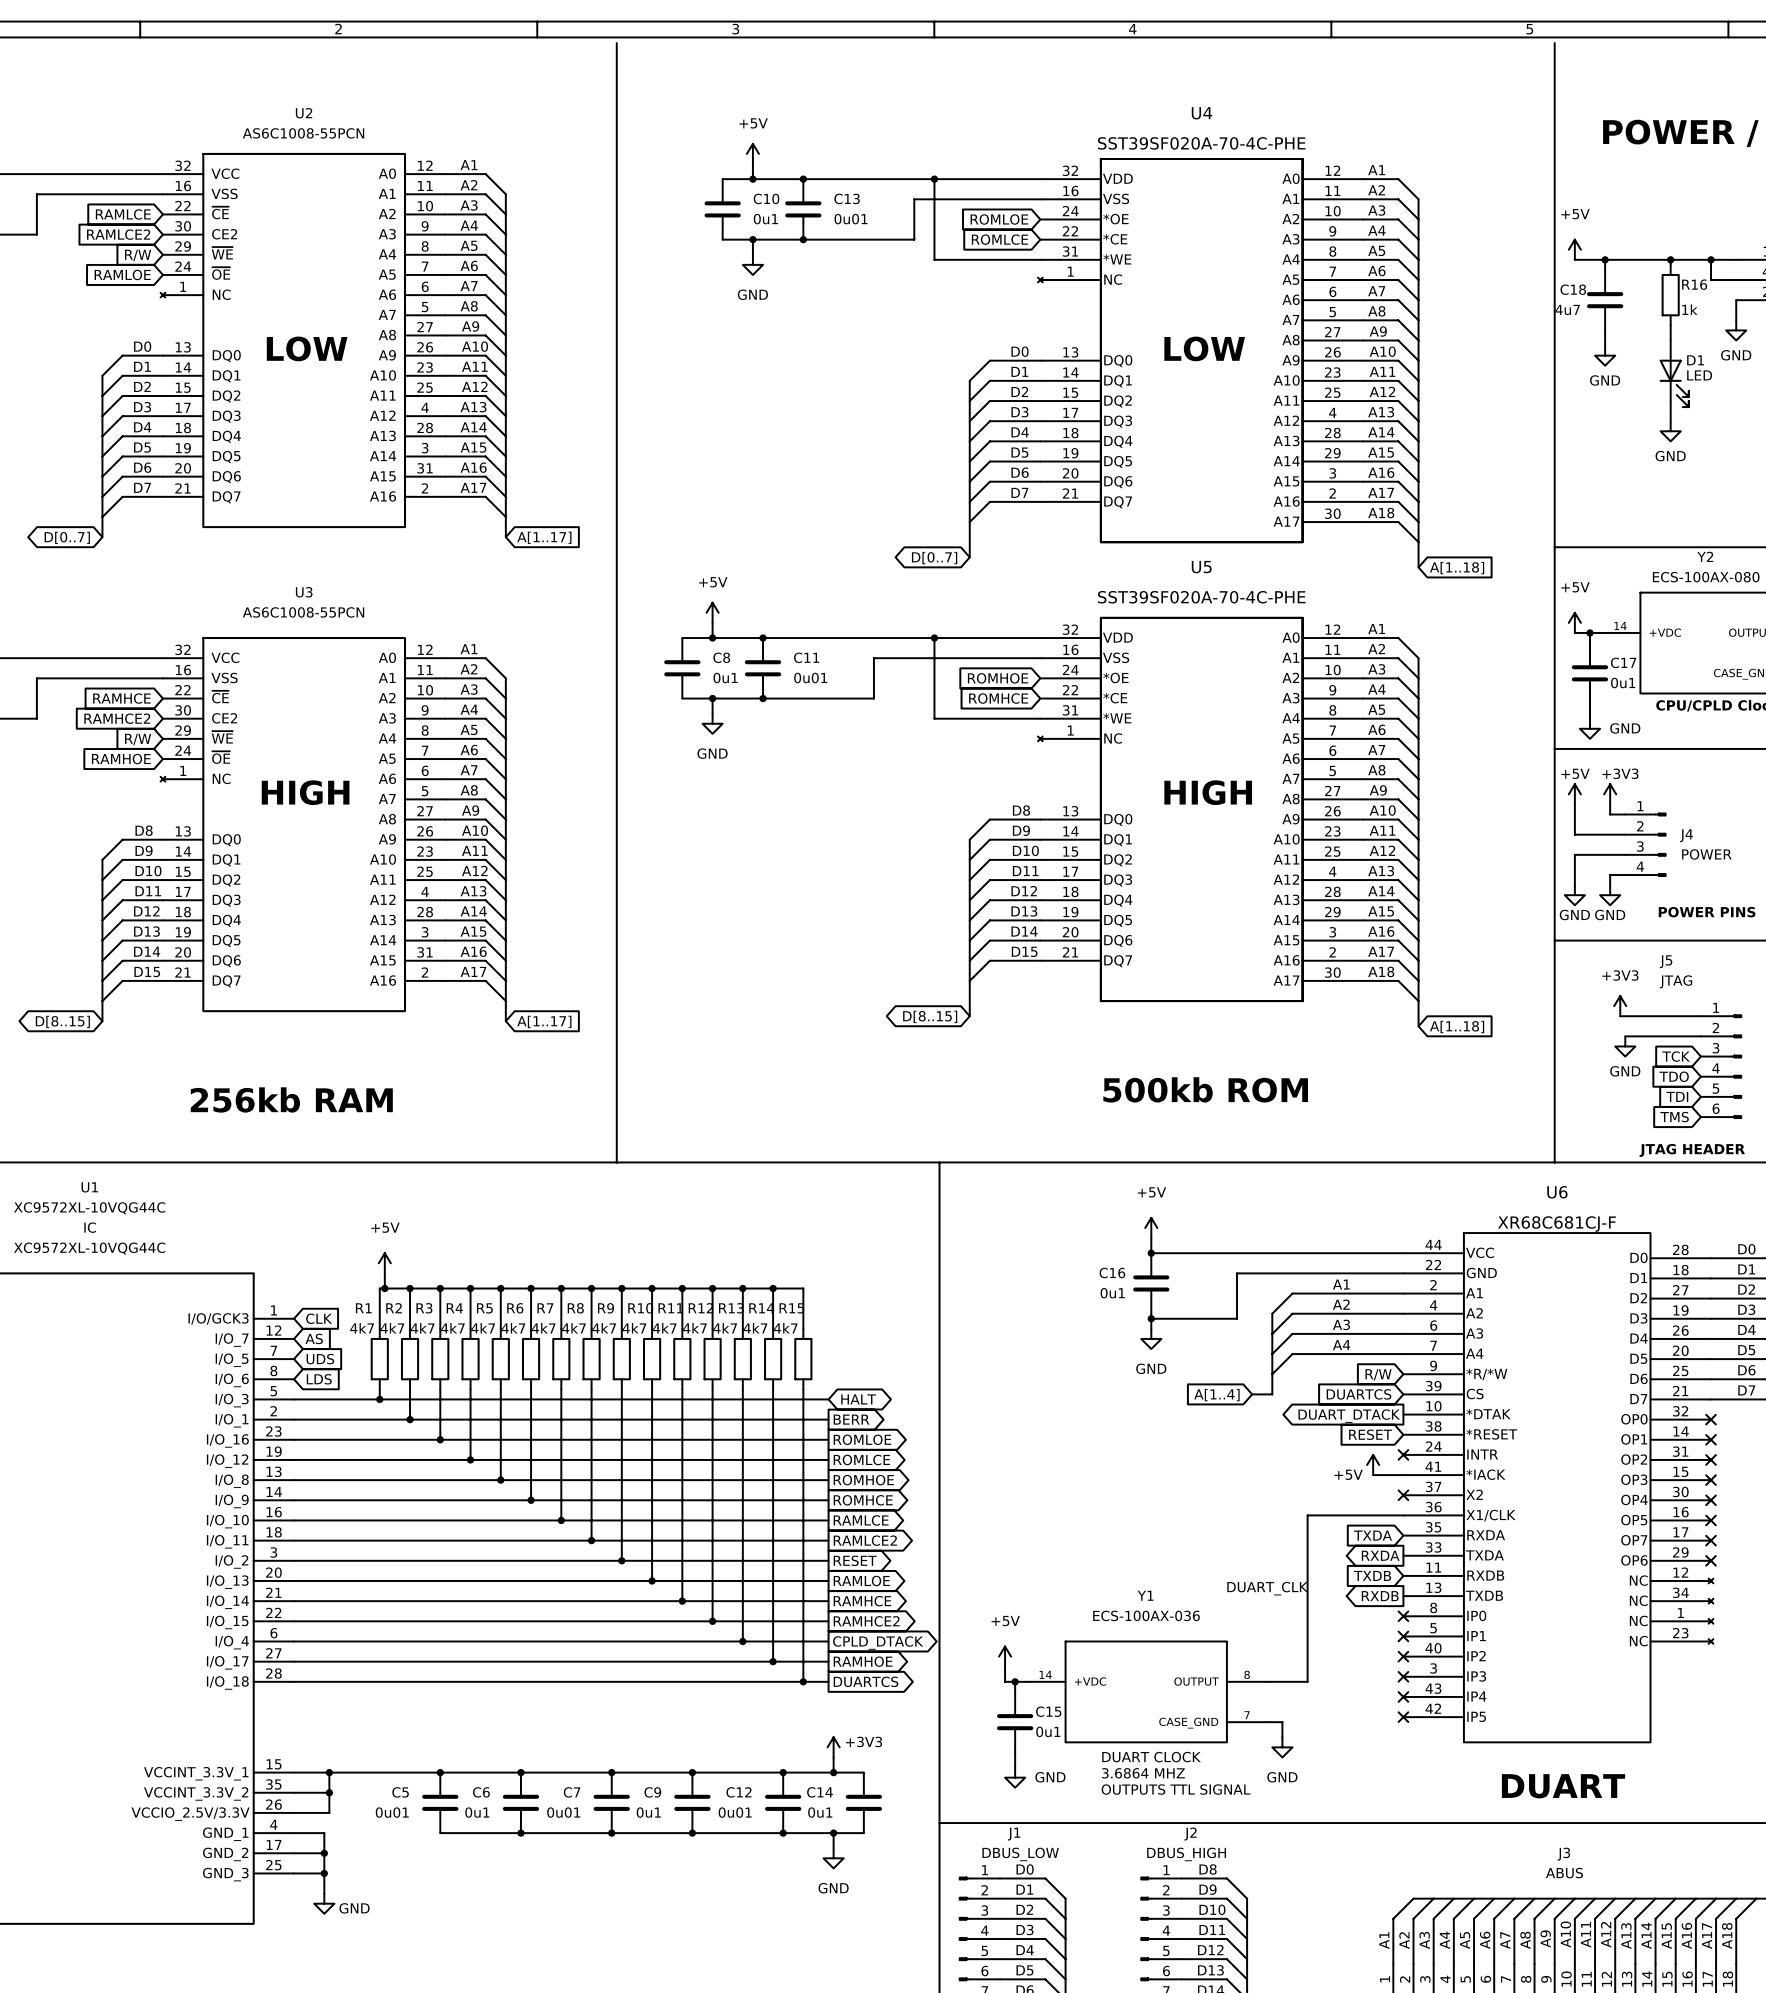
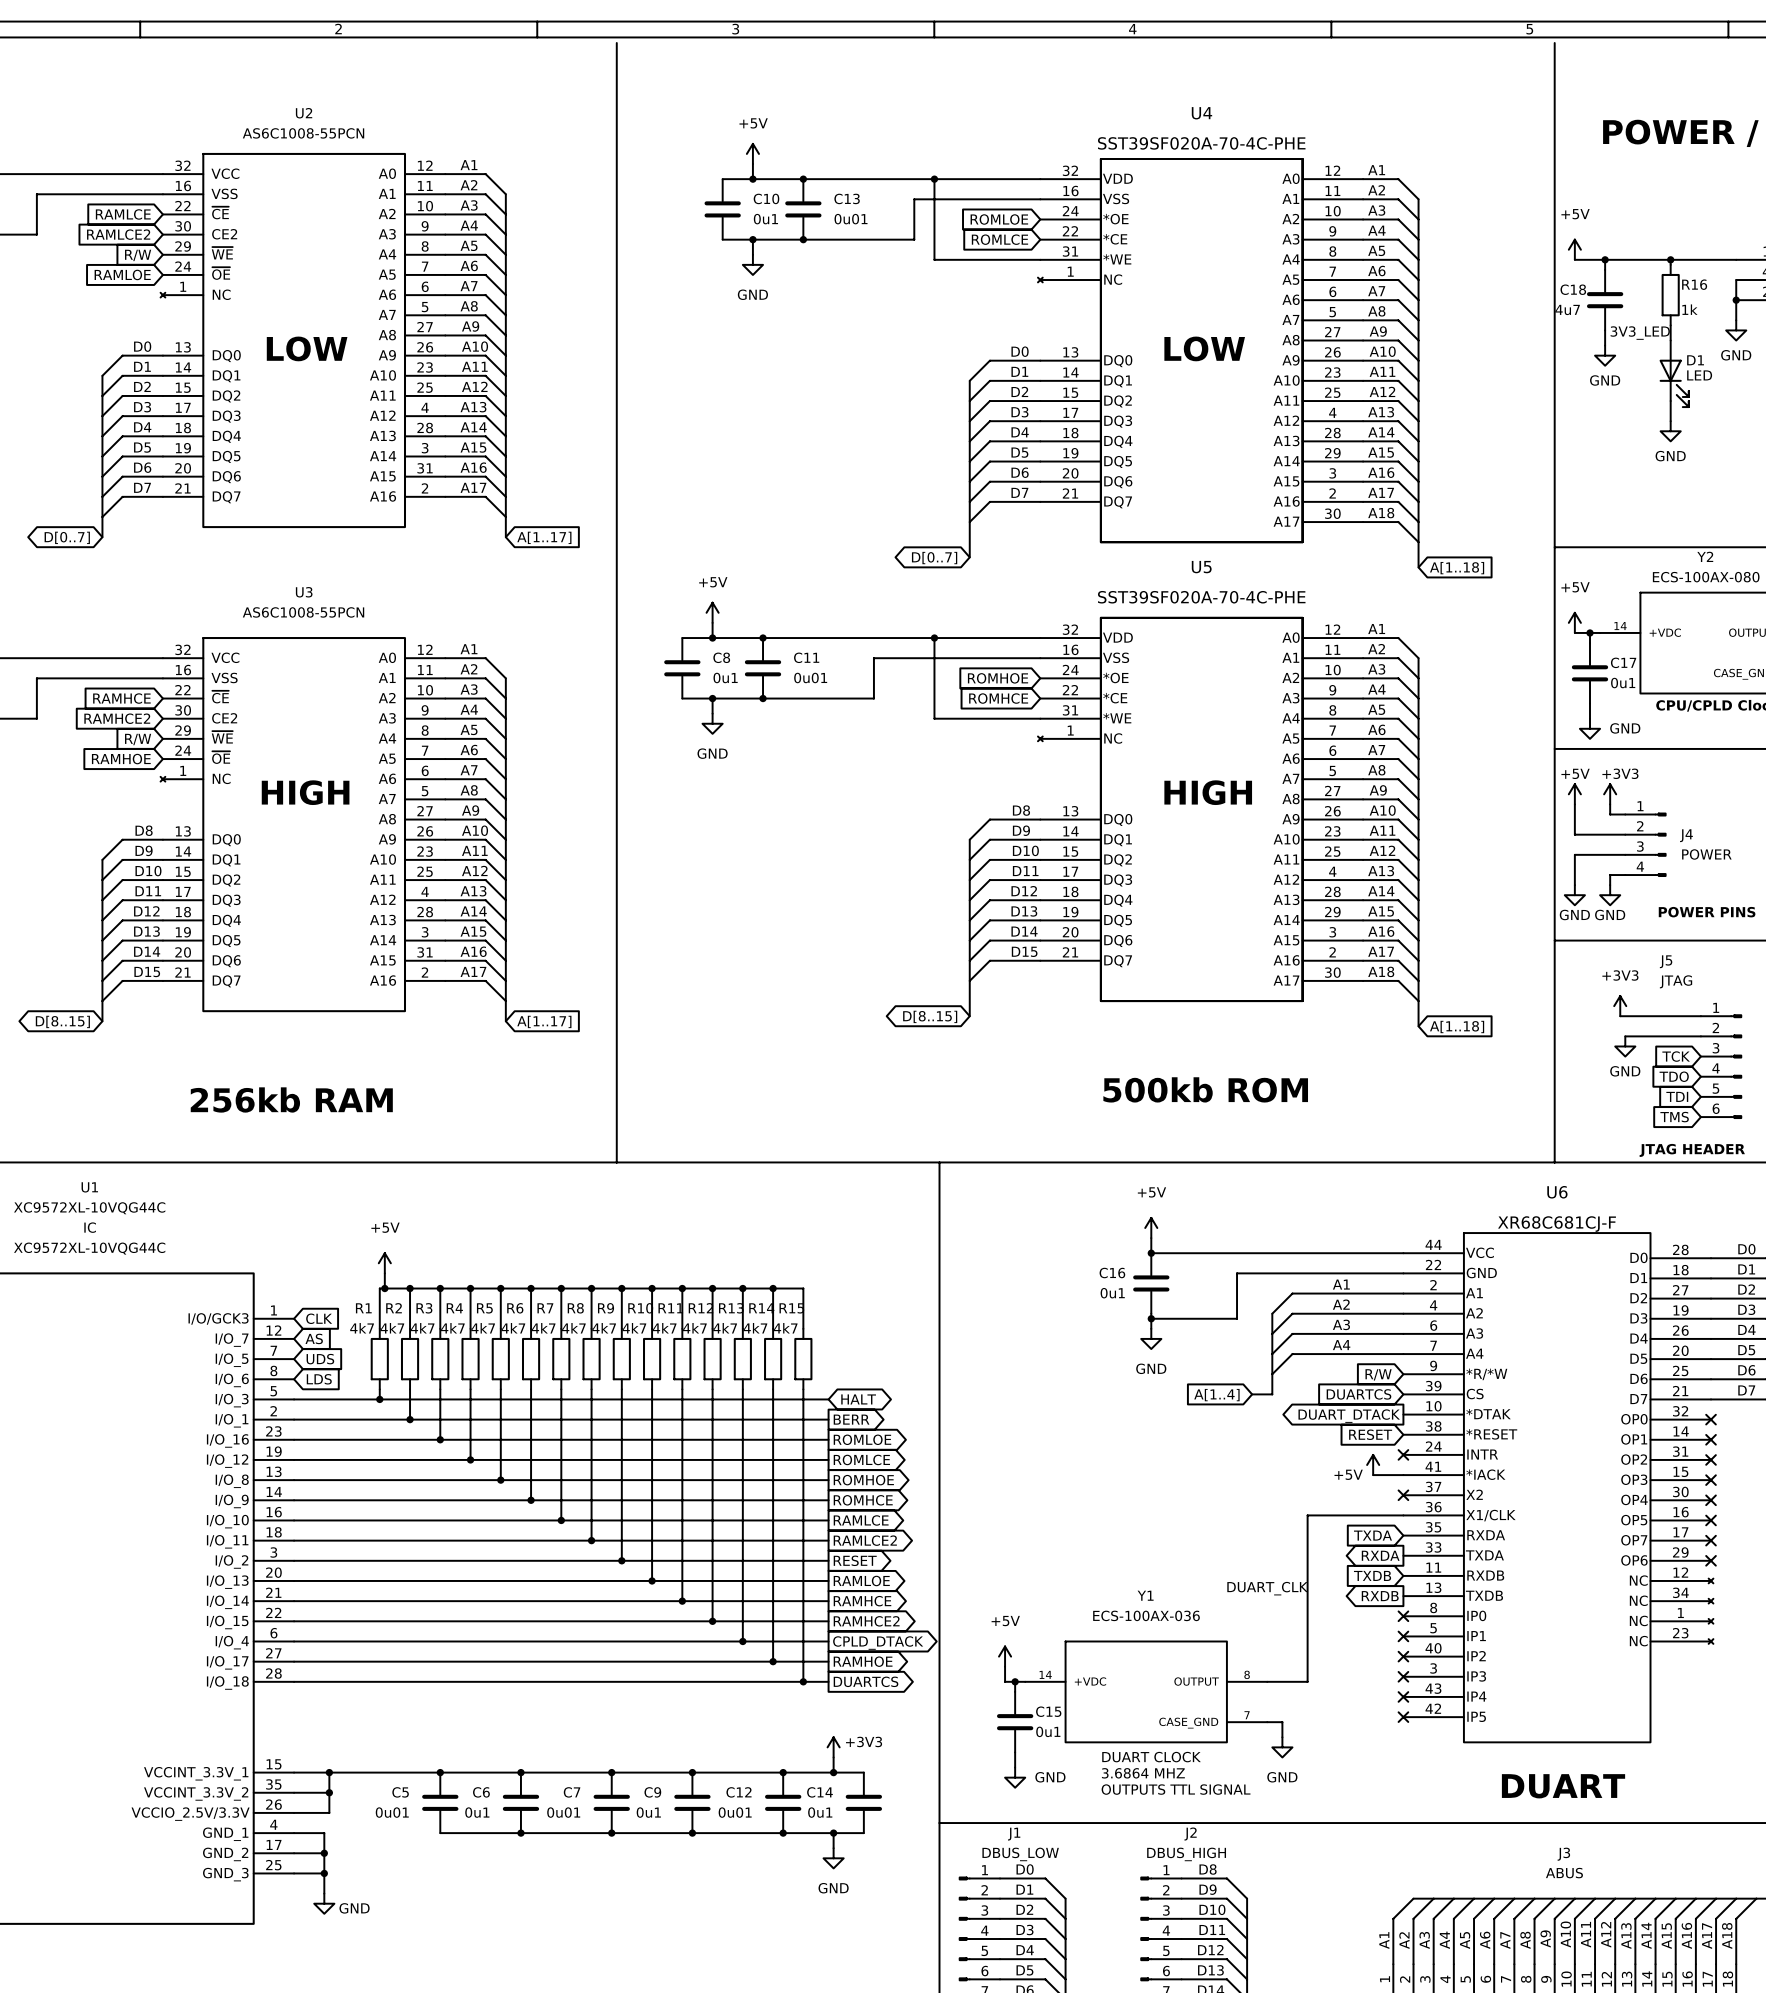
wire: (1711, 259) (1711, 280) (1736, 280) -> (1736, 300) (1736, 280)
junction position: (1711, 259) -> (1736, 300)
label: none -> 3V3_LED (1640, 333)

